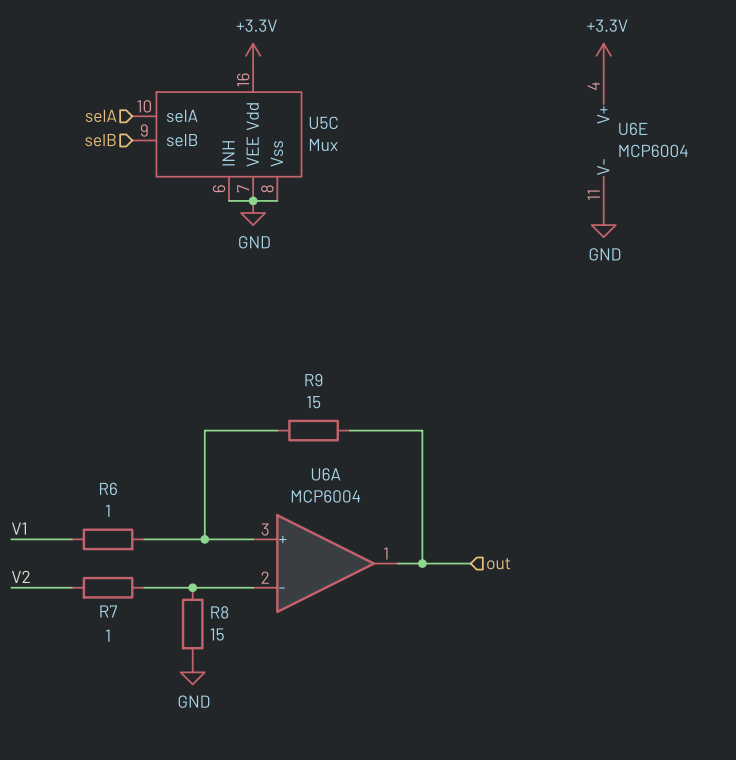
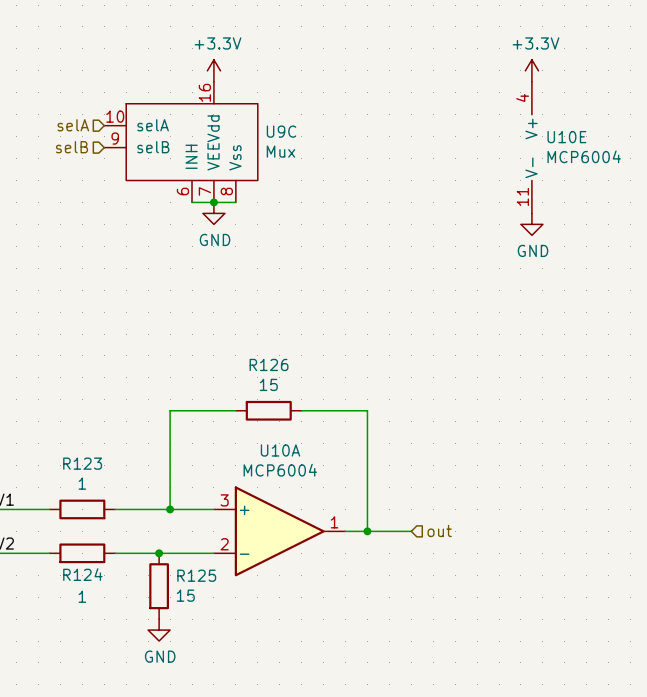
U5C name: U5C (323, 122) -> U9C (281, 131)
U6E name: U6E (633, 128) -> U10E (566, 137)
R9 name: R9 (313, 380) -> R126 (269, 364)
U6A name: U6A (326, 474) -> U10A (280, 450)
R6 name: R6 (108, 488) -> R123 (82, 463)
R7 name: R7 (108, 611) -> R124 (82, 574)
R8 name: R8 (219, 612) -> R125 (196, 575)

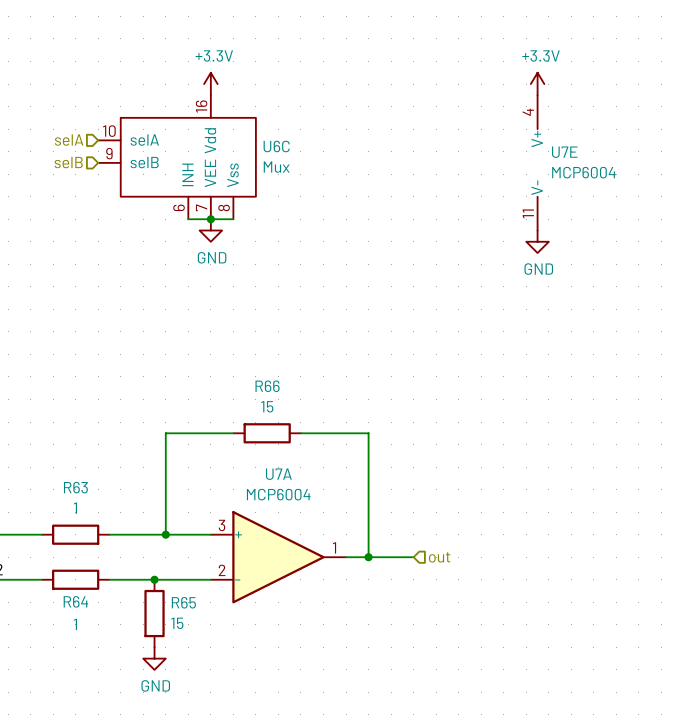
U9C name: U9C (281, 131) -> U6C (276, 146)
U10E name: U10E (566, 137) -> U7E (564, 152)
R126 name: R126 (269, 364) -> R66 (267, 386)
U10A name: U10A (280, 450) -> U7A (278, 474)
R123 name: R123 (82, 463) -> R63 (75, 487)
R124 name: R124 (82, 574) -> R64 (75, 601)
R125 name: R125 (196, 575) -> R65 (183, 602)

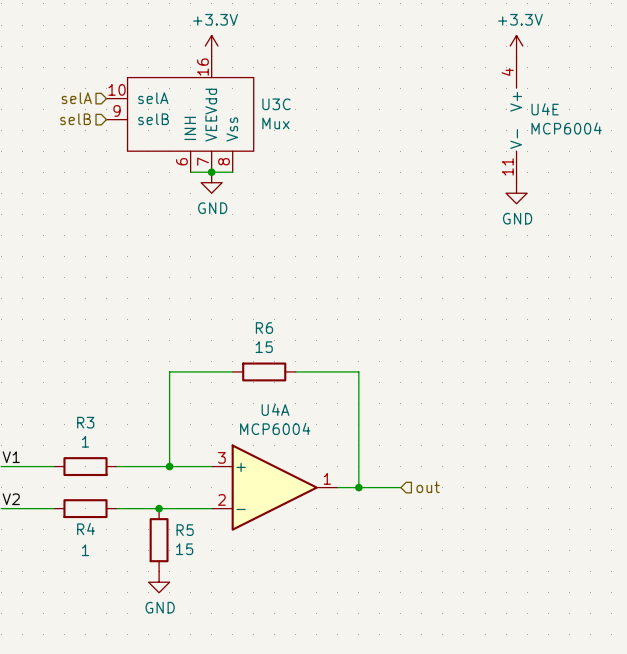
U6C name: U6C (276, 146) -> U3C (276, 104)
U7E name: U7E (564, 152) -> U4E (545, 109)
R66 name: R66 (267, 386) -> R6 (264, 328)
U7A name: U7A (278, 474) -> U4A (275, 409)
R63 name: R63 (75, 487) -> R3 (85, 422)
R64 name: R64 (75, 601) -> R4 (85, 529)
R65 name: R65 (183, 602) -> R5 (185, 530)

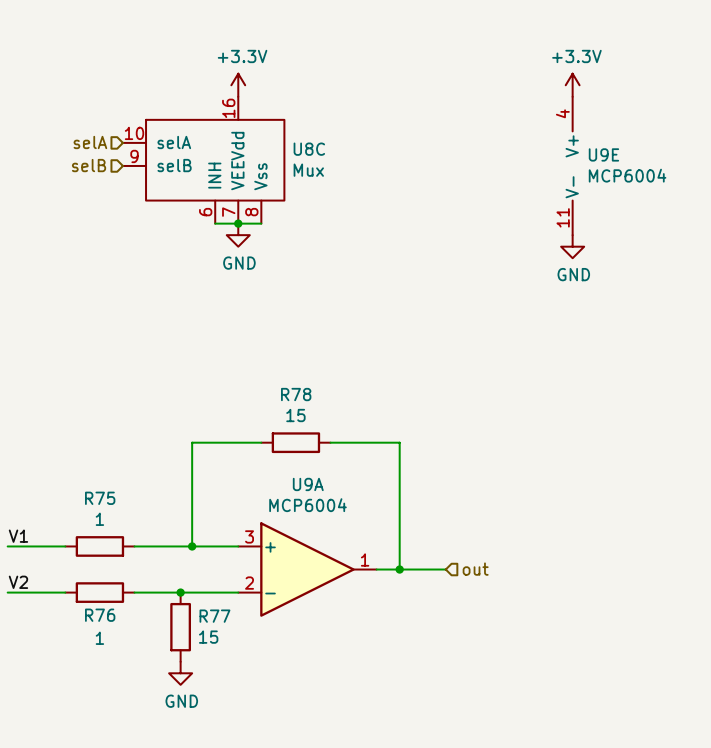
U3C name: U3C (276, 104) -> U8C (309, 149)
U4E name: U4E (545, 109) -> U9E (603, 154)
R6 name: R6 (264, 328) -> R78 (296, 394)
U4A name: U4A (275, 409) -> U9A (308, 484)
R3 name: R3 (85, 422) -> R75 (100, 498)
R4 name: R4 (85, 529) -> R76 (100, 615)
R5 name: R5 (185, 530) -> R77 (214, 616)

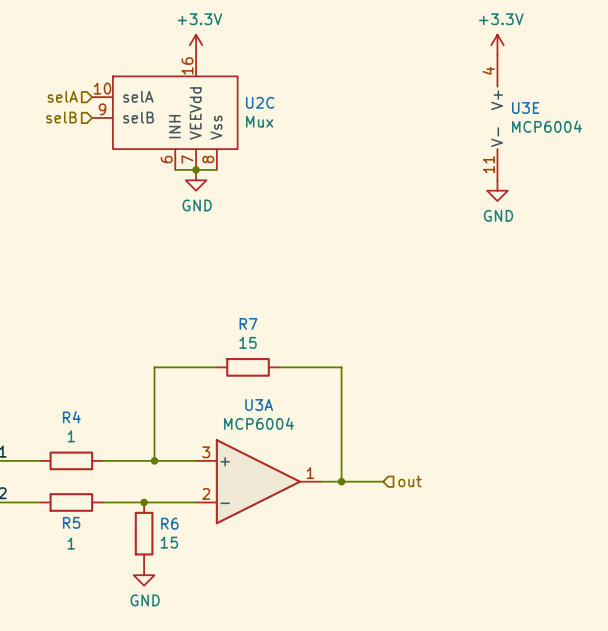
U8C name: U8C (309, 149) -> U2C (260, 102)
U9E name: U9E (603, 154) -> U3E (525, 107)
R78 name: R78 (296, 394) -> R7 (248, 323)
U9A name: U9A (308, 484) -> U3A (259, 405)
R75 name: R75 (100, 498) -> R4 (71, 417)
R76 name: R76 (100, 615) -> R5 (71, 522)
R77 name: R77 (214, 616) -> R6 (169, 523)

